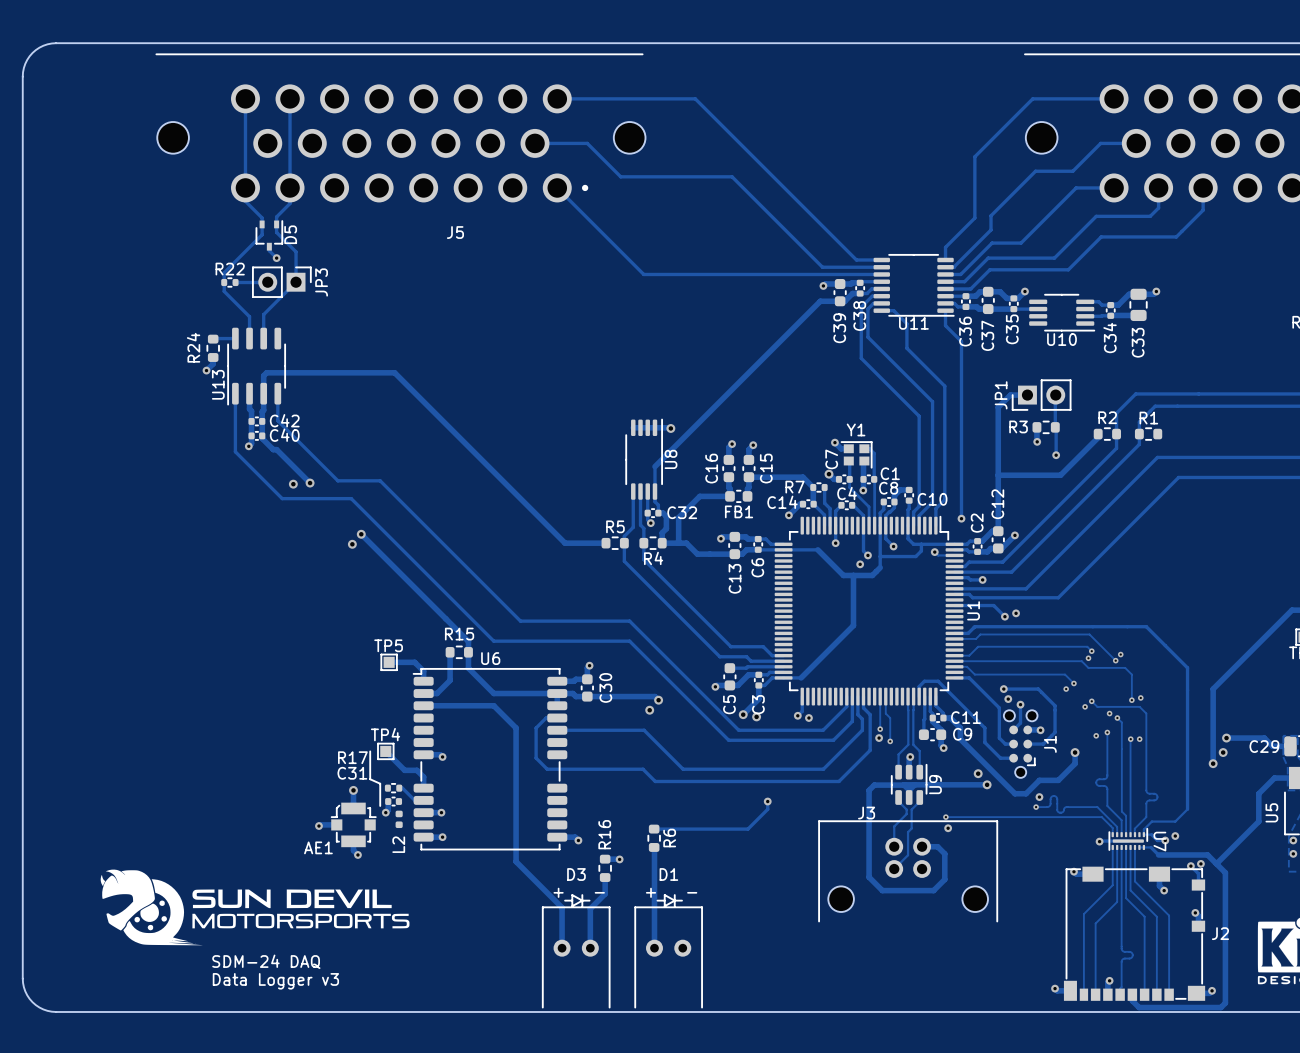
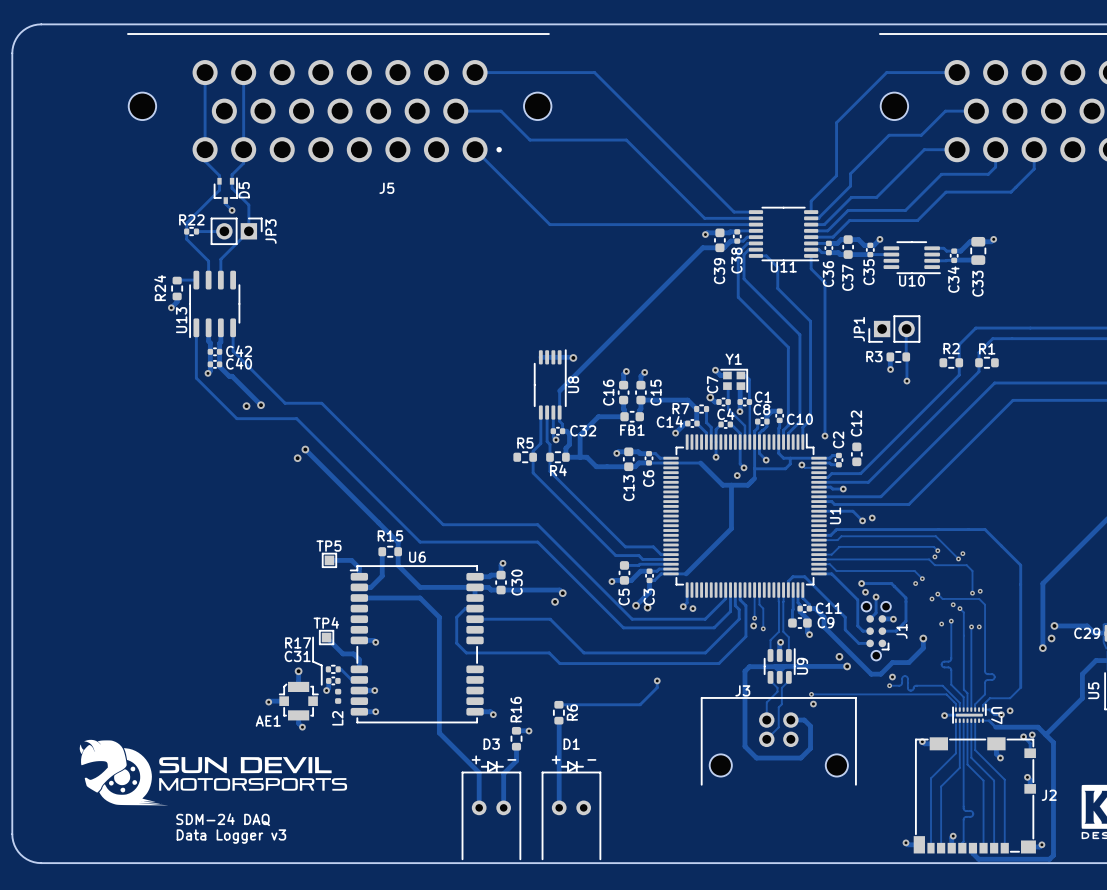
track: (263, 393) (263, 375) (266, 372) (394, 372) (565, 543) (605, 543) -> none
track: (1027, 395) (1010, 395) (998, 407) (998, 531) (992, 531) (982, 541) (977, 541) -> none
track: (1098, 434) (1098, 437) (1060, 475) (998, 475) -> none
track: (1014, 535) (1001, 548) (990, 548) (987, 551) (977, 551) -> none
via: (1014, 535) -> none

